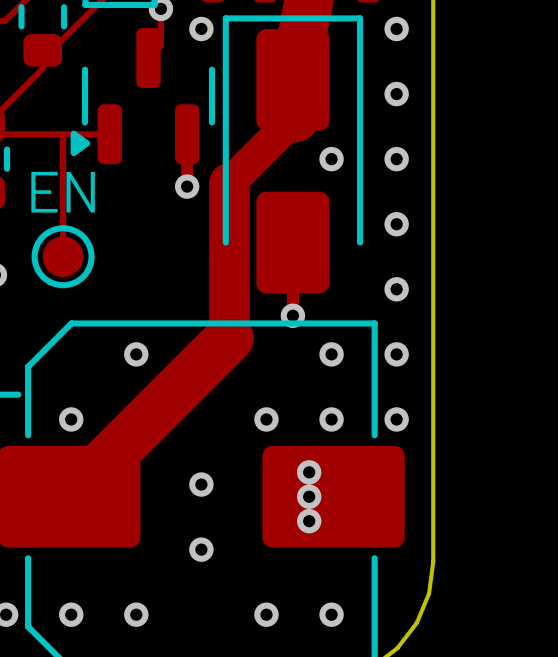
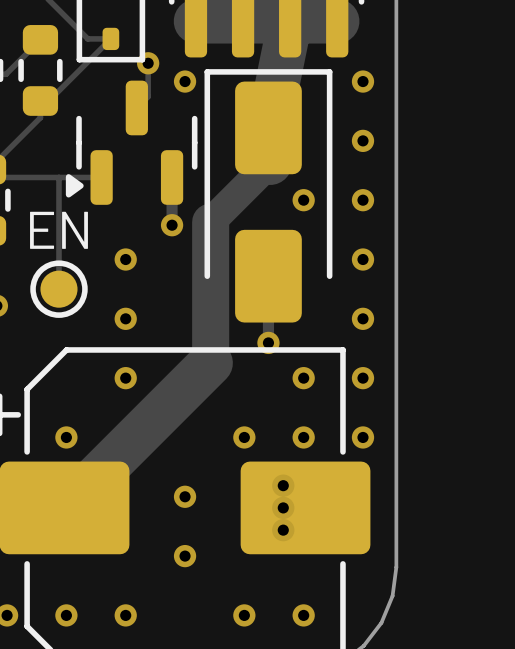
via: none -> (125, 259)
via: none -> (125, 318)

